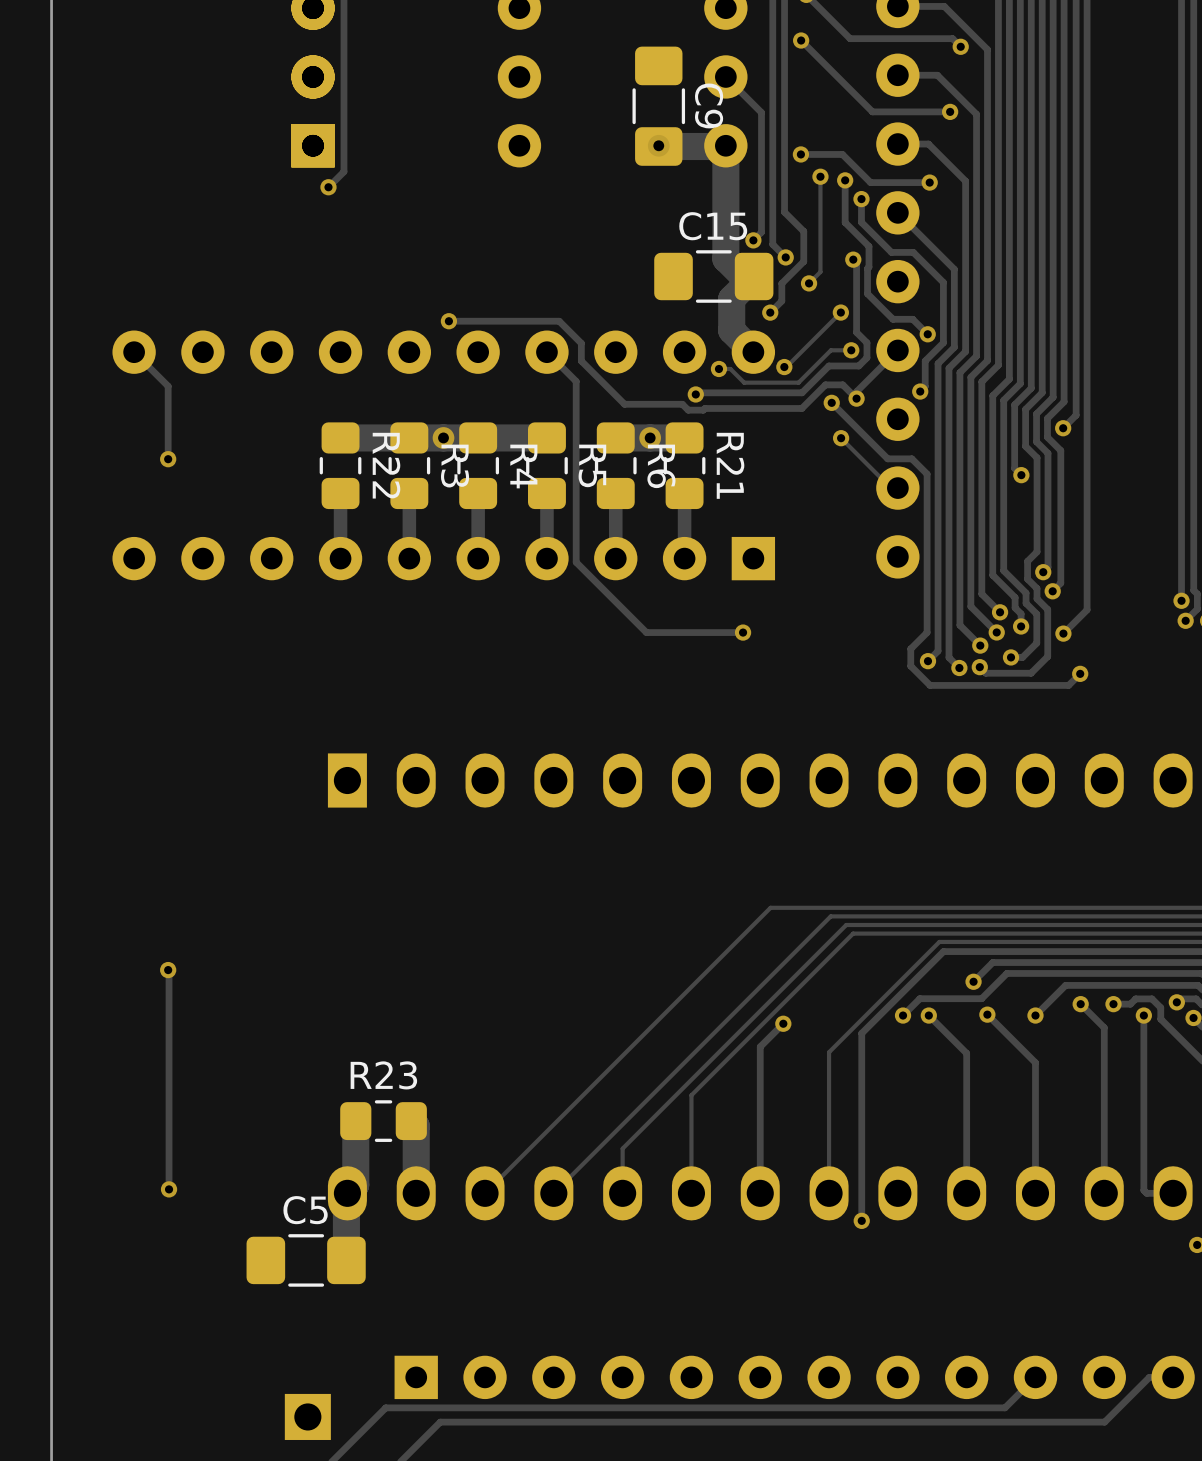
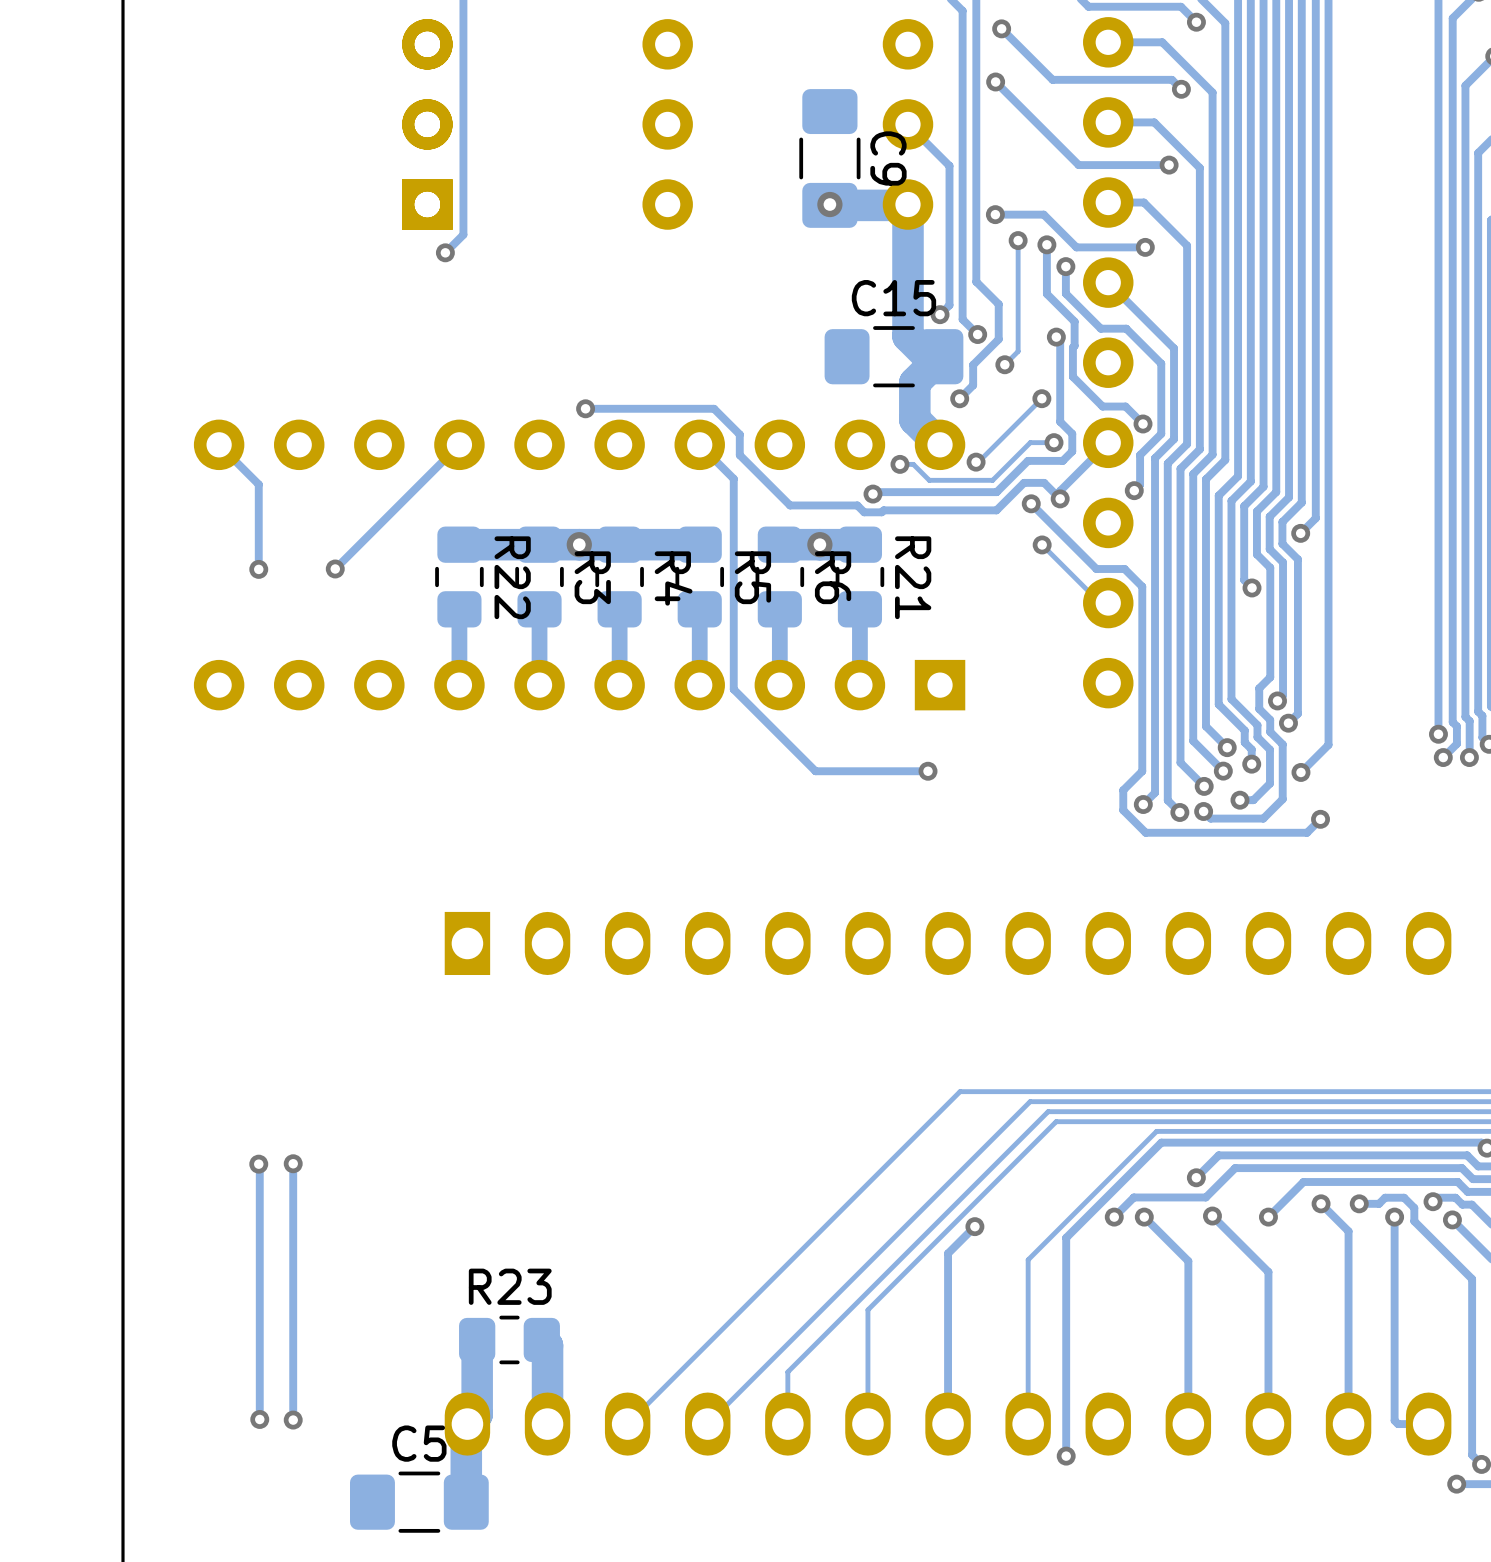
track: none -> (459, 444) (335, 568)
via: none -> (335, 568)
track: none -> (293, 1163) (293, 1420)
via: none -> (293, 1163)
via: none -> (293, 1420)

